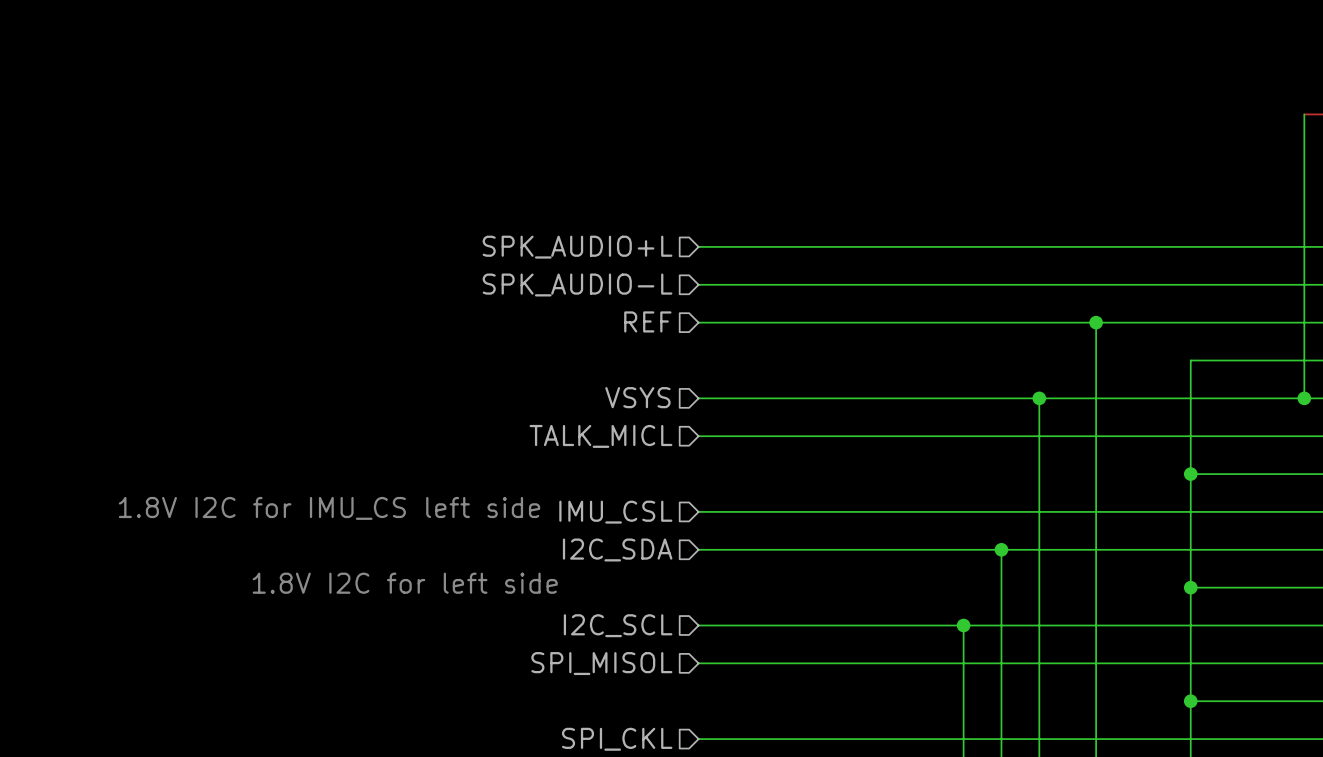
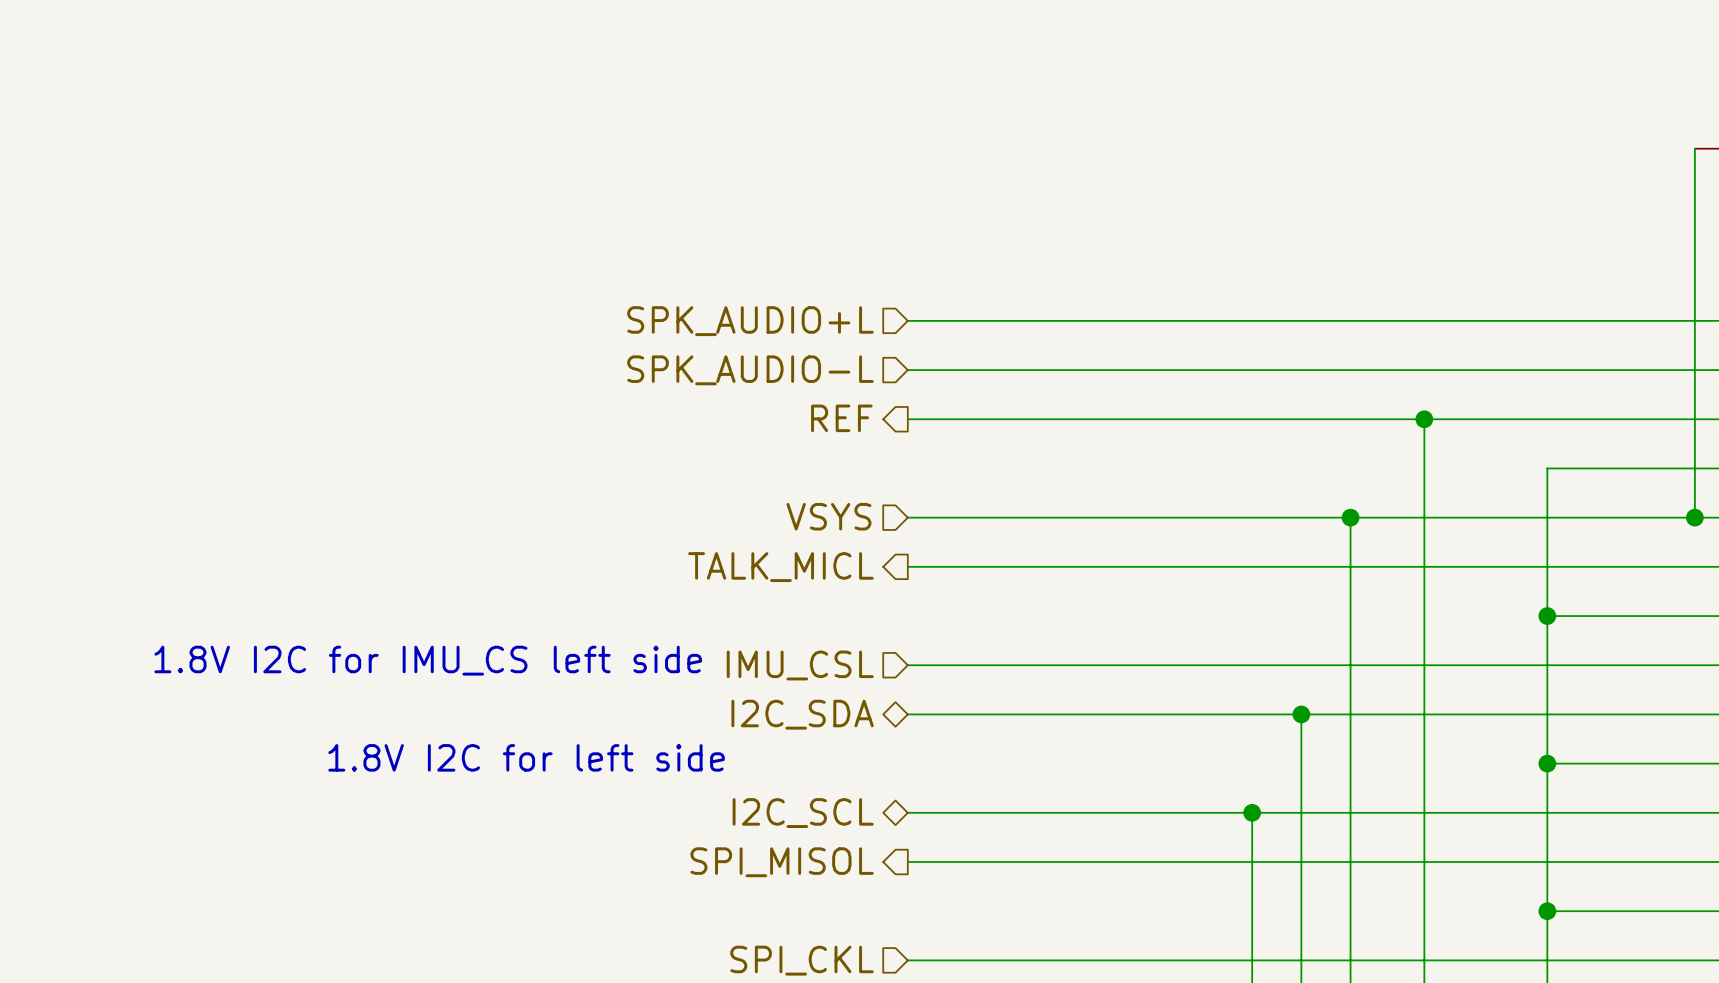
hierarchical label shape: input (647, 321) -> output (841, 418)
hierarchical label shape: input (600, 436) -> output (780, 567)
hierarchical label shape: input (617, 549) -> bidirectional (802, 714)
hierarchical label shape: input (618, 625) -> bidirectional (803, 813)
hierarchical label shape: input (601, 663) -> output (782, 862)

